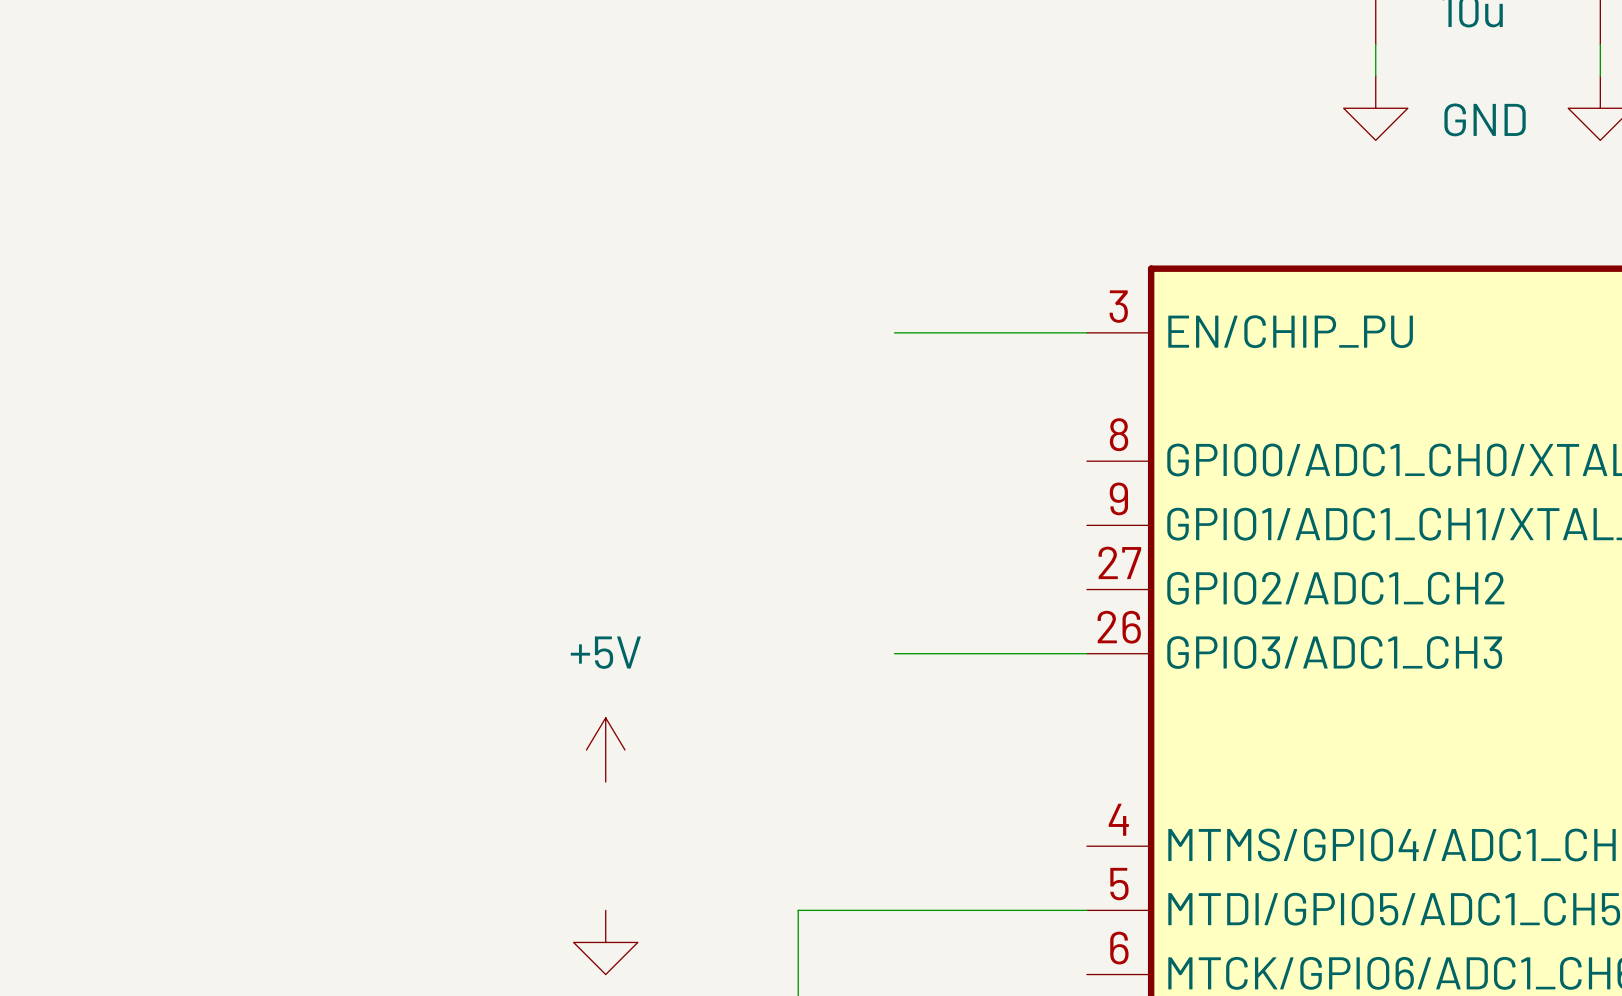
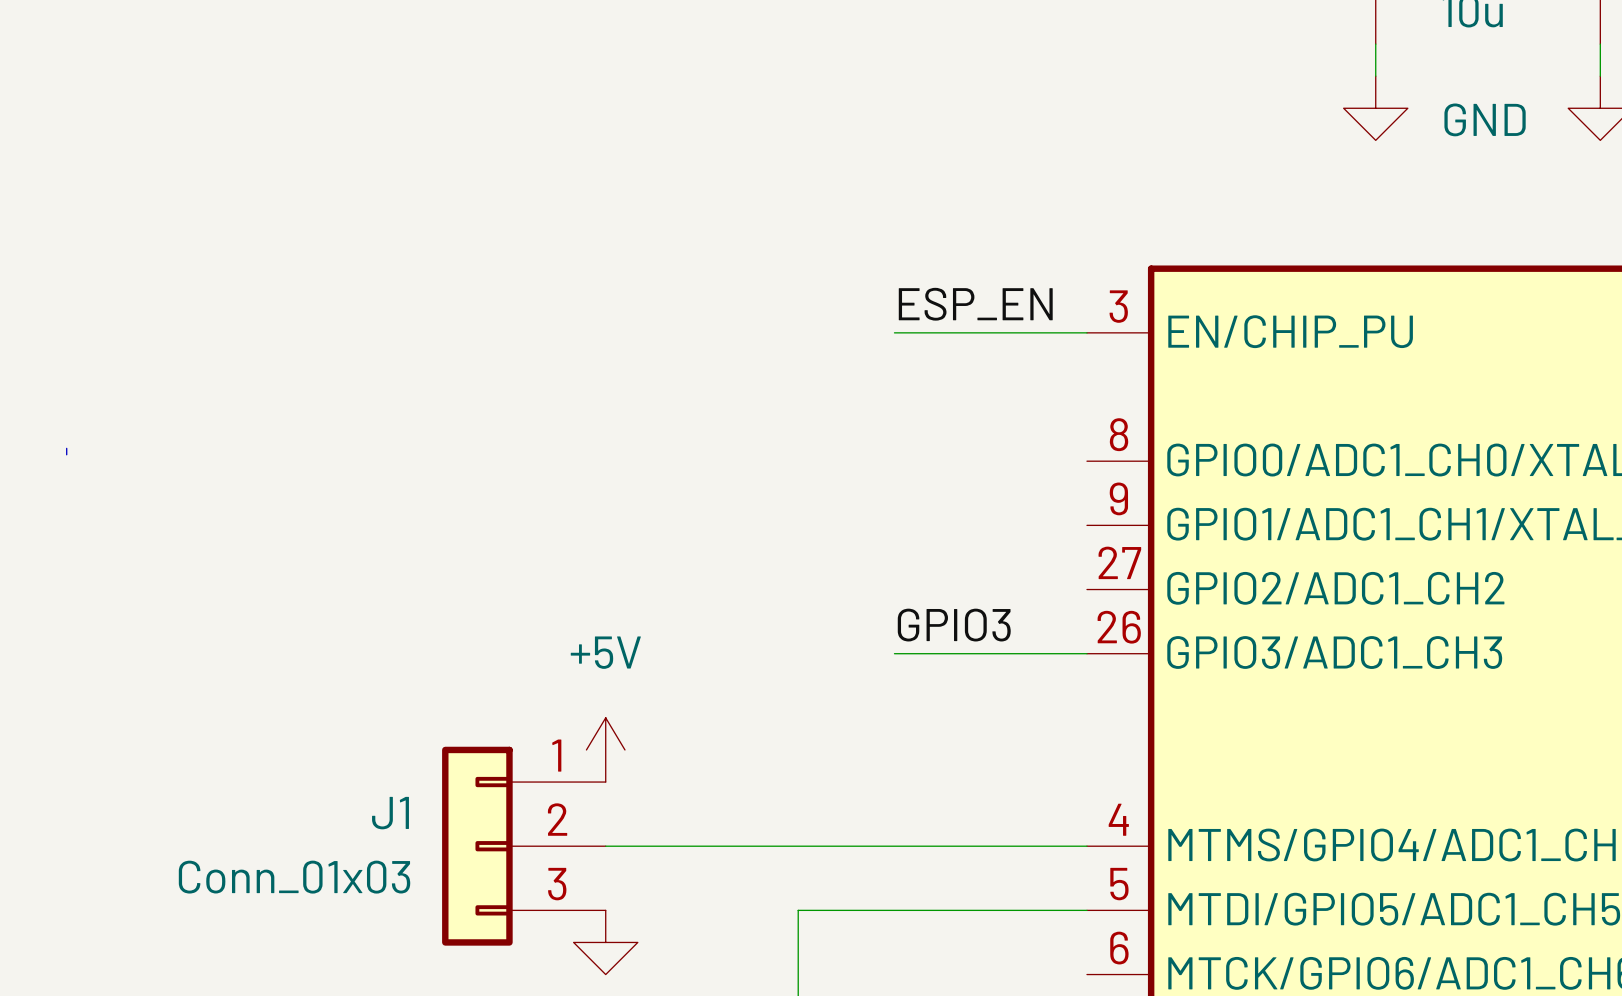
label: none -> ESP_EN (975, 304)
line: none -> (66, 448) (66, 454)
label: none -> GPIO3 (954, 625)
J1: none -> Conn_01x03 (523, 846)
wire: none -> (605, 846) (1086, 846)

